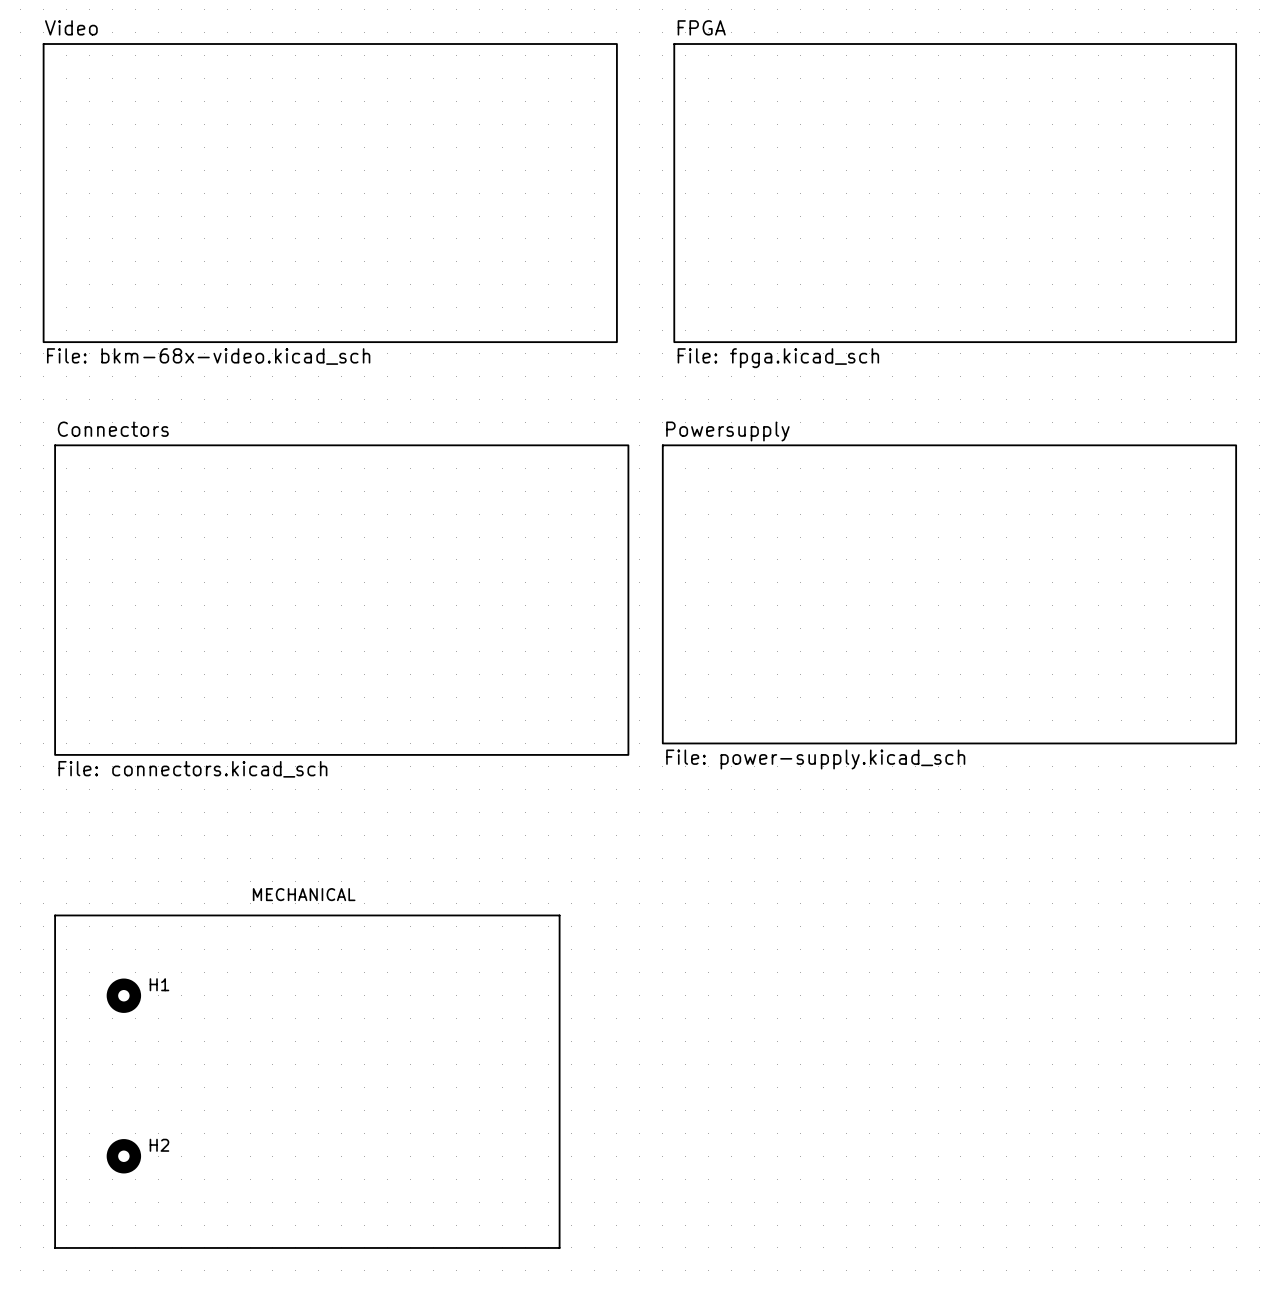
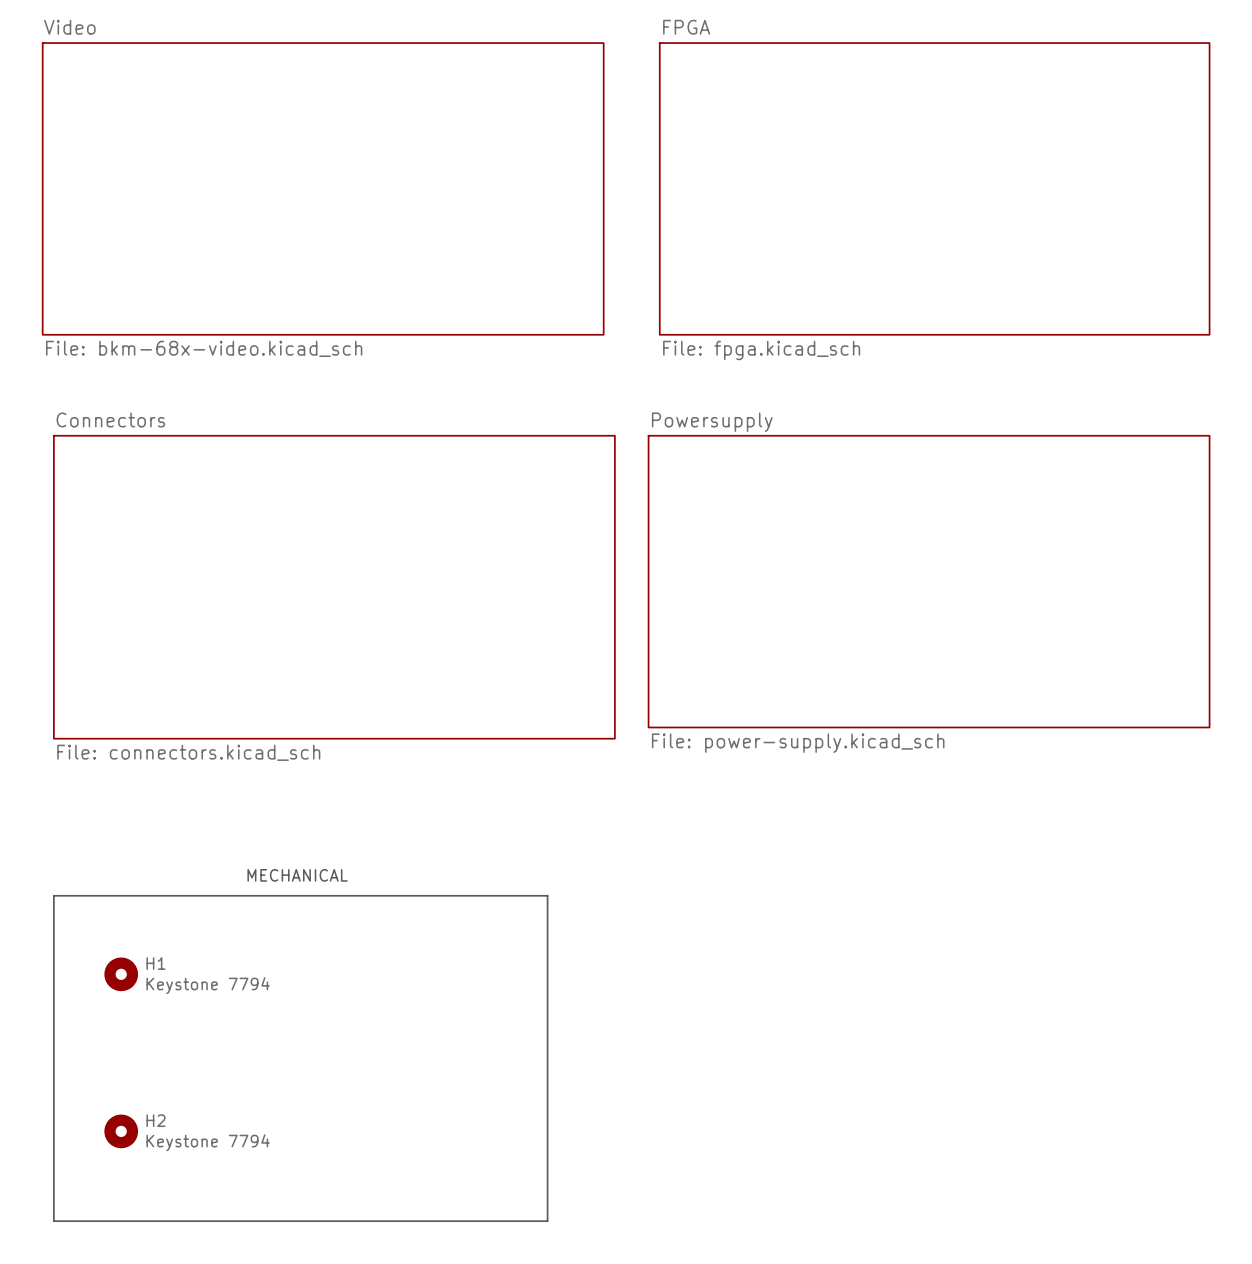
H1 value: none -> Keystone 7794 (208, 985)
H2 value: none -> Keystone 7794 (208, 1142)

